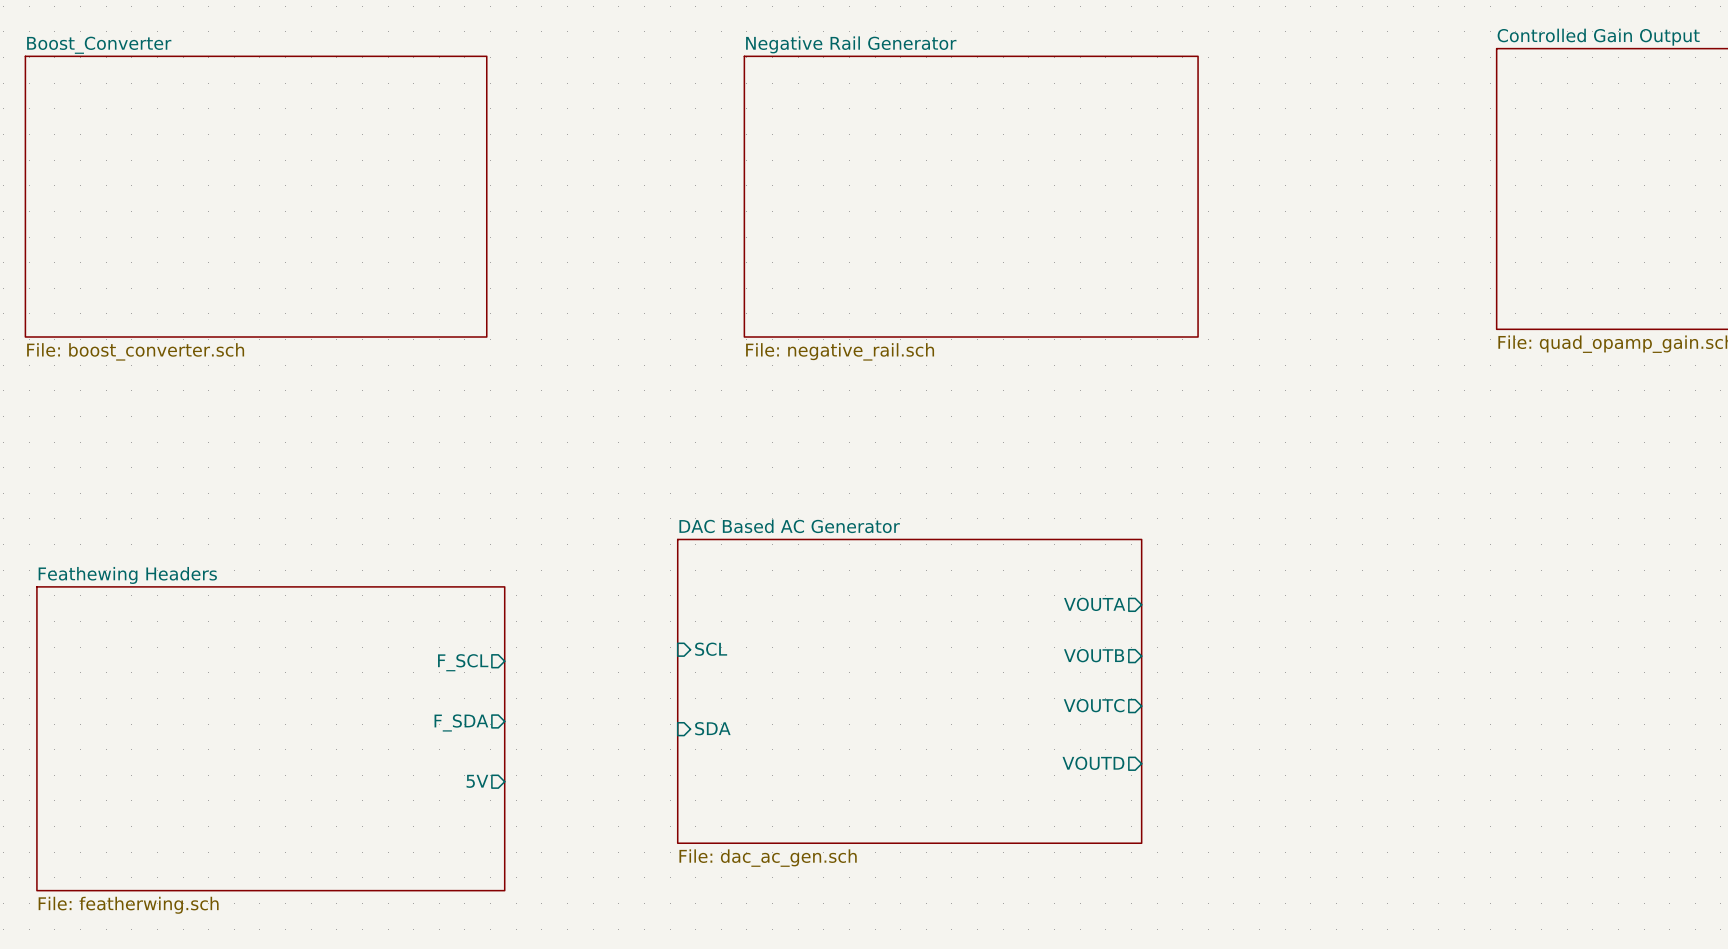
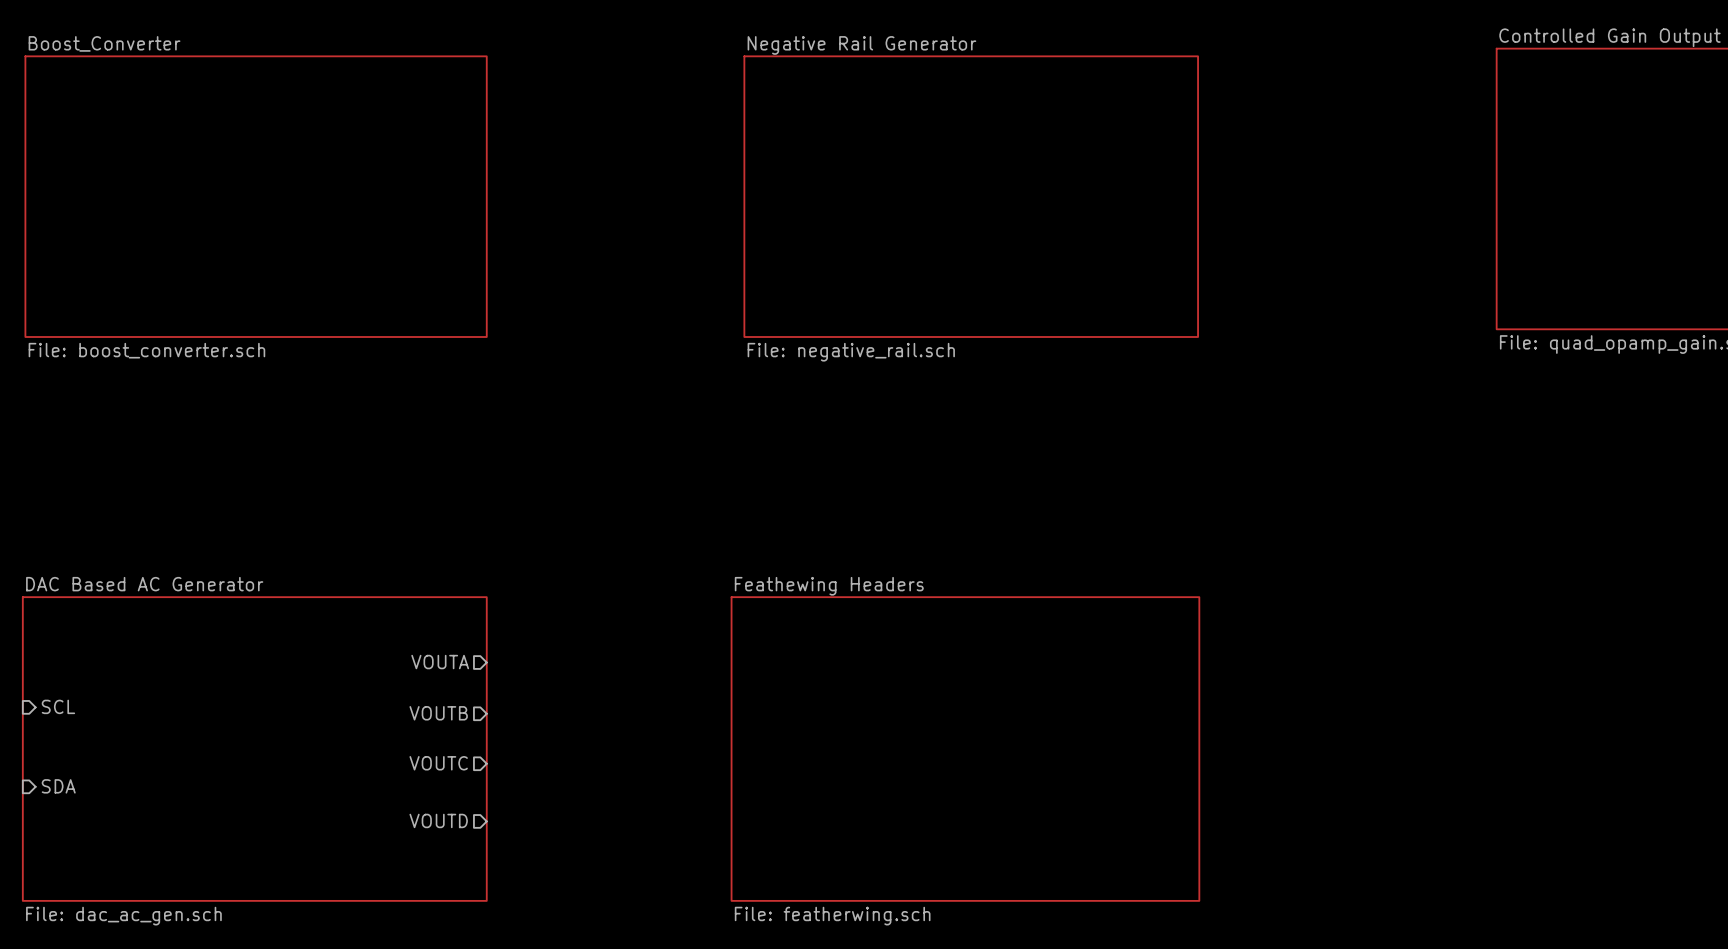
sheet pin: VOUTA (1094, 604) -> none
sheet pin: SCL (711, 649) -> none
sheet pin: VOUTB (1094, 655) -> none
sheet pin: none -> VOUTA (440, 662)
sheet pin: F_SCL (463, 662) -> none
sheet DAC Based AC Generator: File: dac_ac_gen.sch (909, 691) -> none
sheet pin: VOUTC (1094, 705) -> none
sheet pin: none -> SCL (58, 706)
sheet pin: none -> VOUTB (438, 713)
sheet pin: F_SDA (461, 722) -> none
sheet pin: SDA (712, 728) -> none
sheet Feathewing Headers: File: featherwing.sch (270, 738) -> none
sheet DAC Based AC Generator: none -> File: dac_ac_gen.sch (254, 749)
sheet Feathewing Headers: none -> File: featherwing.sch (965, 749)
sheet pin: none -> VOUTC (438, 763)
sheet pin: VOUTD (1093, 763) -> none
sheet pin: 5V (477, 781) -> none
sheet pin: none -> SDA (58, 786)
sheet pin: none -> VOUTD (438, 820)

